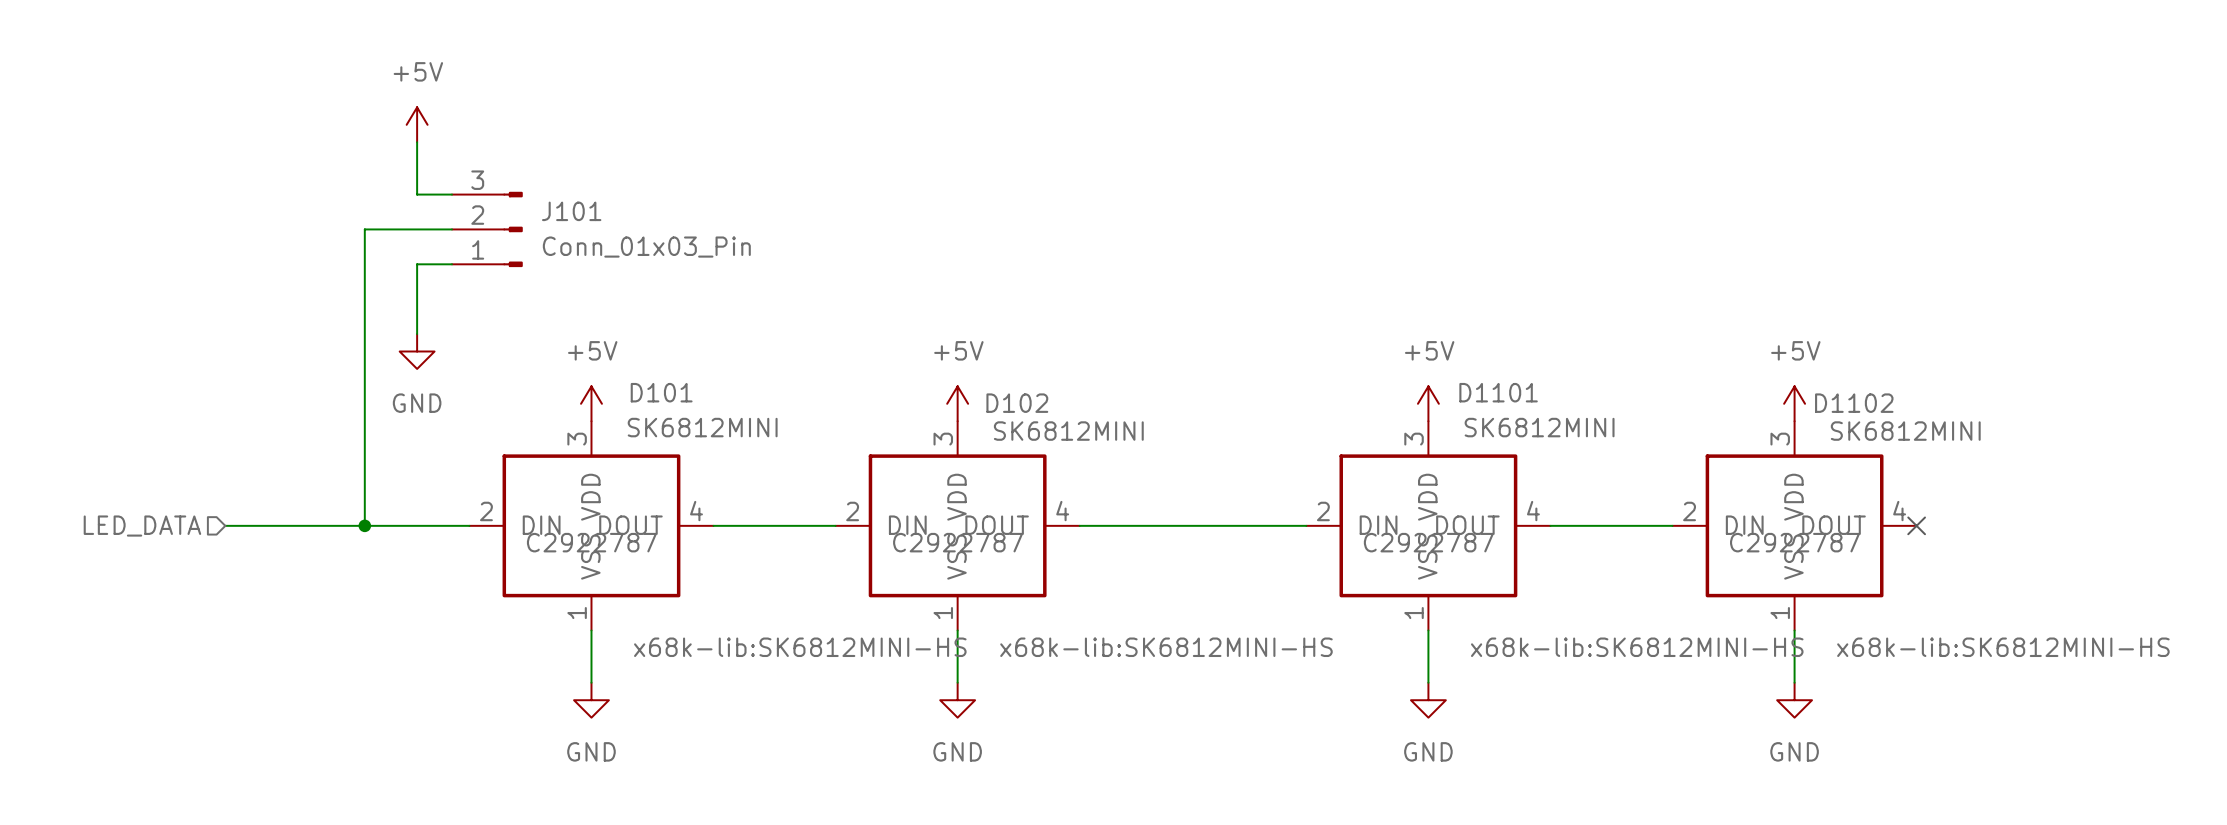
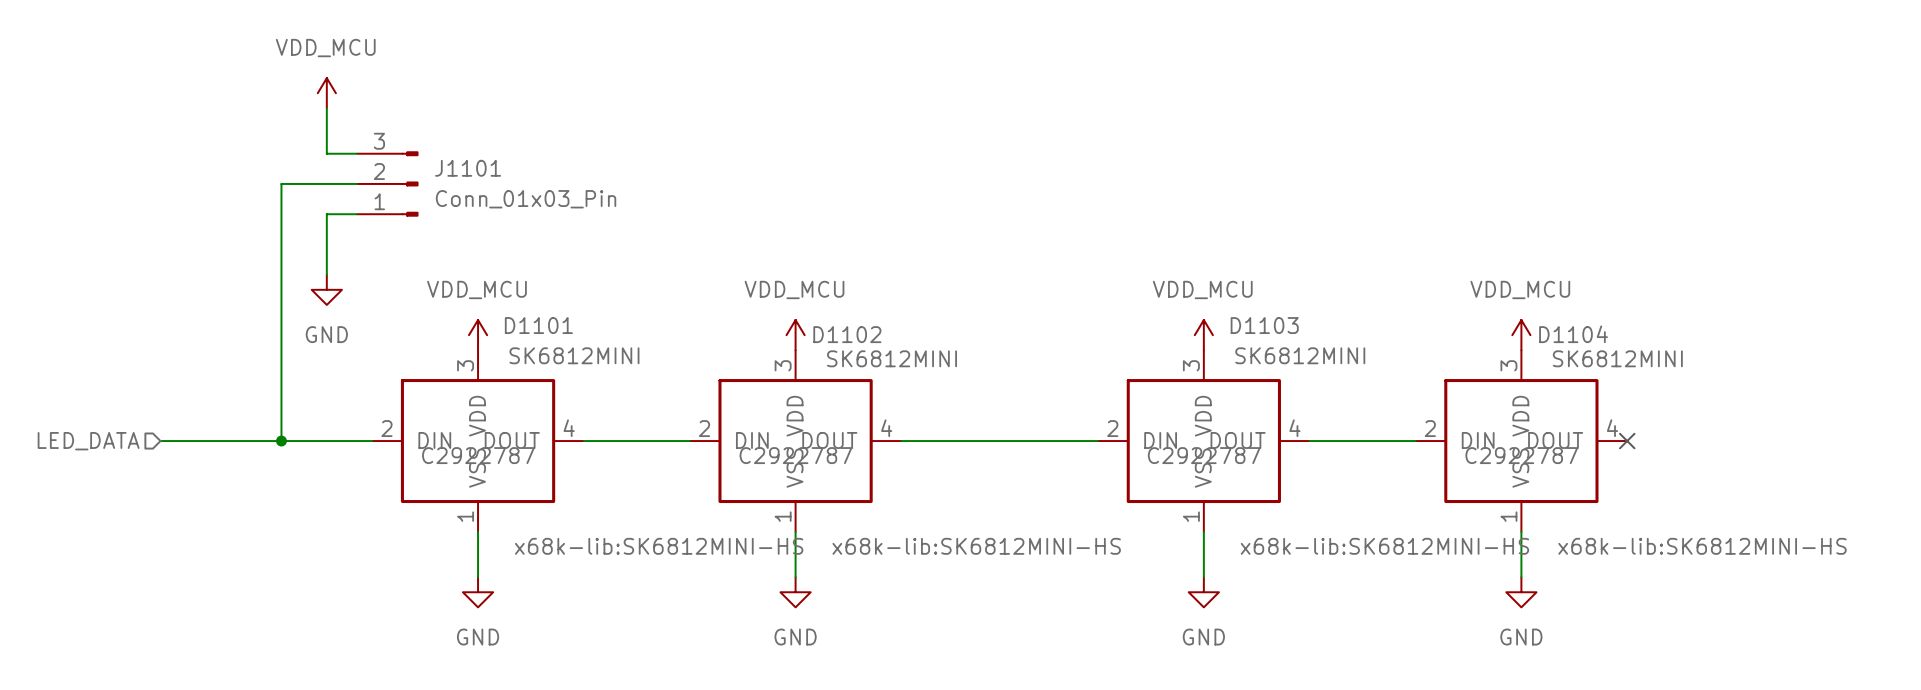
power symbol: +5V (417, 124) -> VDD_MCU (326, 93)
J101 name: J101 (571, 211) -> J1101 (468, 168)
D101 name: D101 (661, 392) -> D1101 (538, 325)
D1101 name: D1101 (1498, 392) -> D1103 (1264, 325)
power symbol: +5V (591, 403) -> VDD_MCU (478, 335)
power symbol: +5V (957, 403) -> VDD_MCU (795, 335)
D102 name: D102 (1017, 403) -> D1102 (847, 334)
power symbol: +5V (1428, 403) -> VDD_MCU (1203, 335)
power symbol: +5V (1794, 403) -> VDD_MCU (1521, 335)
D1102 name: D1102 (1854, 403) -> D1104 (1573, 334)

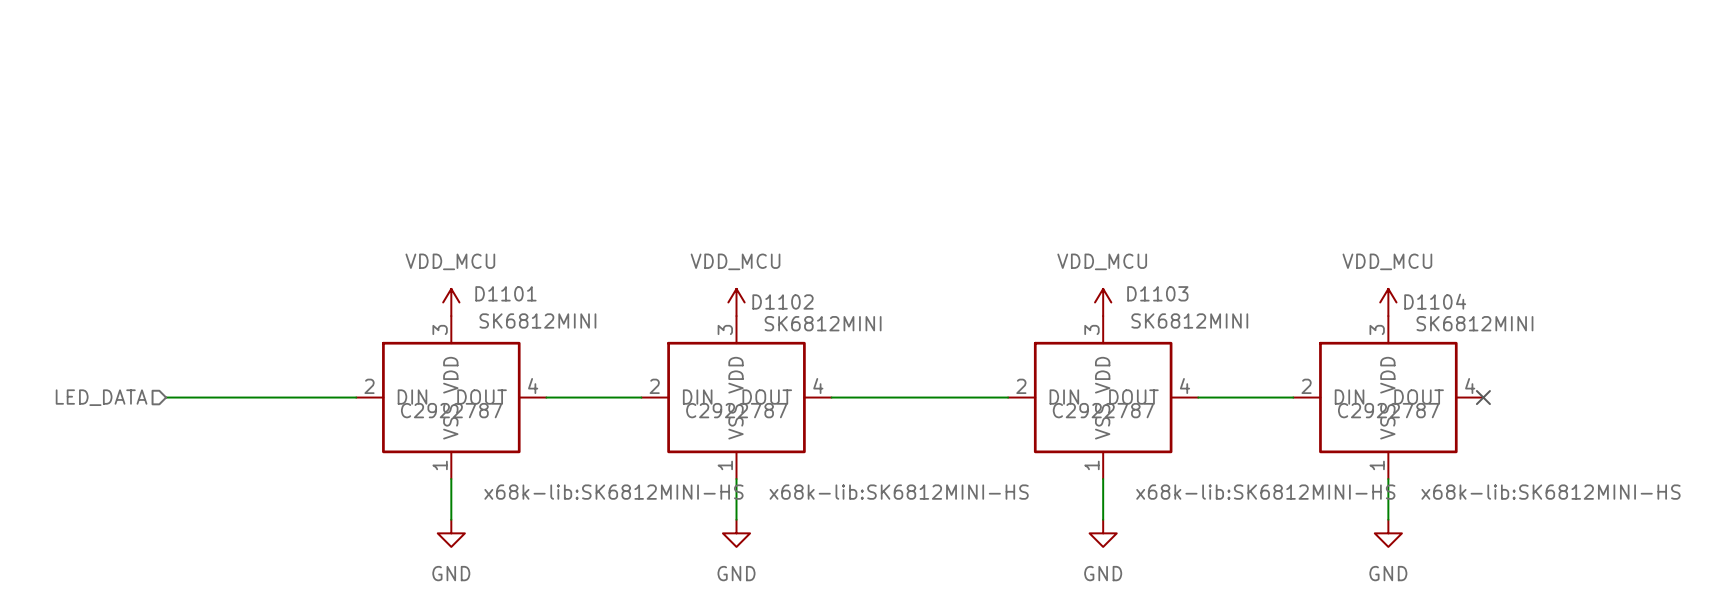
power symbol: VDD_MCU (326, 93) -> none
wire: (326, 108) (326, 153) (357, 153) -> none
wire: (357, 183) (281, 183) (281, 441) -> none
J1101: Conn_01x03_Pin (387, 183) -> none
wire: (357, 214) (326, 214) (326, 274) -> none
power symbol: GND (326, 289) -> none
junction: (281, 441) -> none

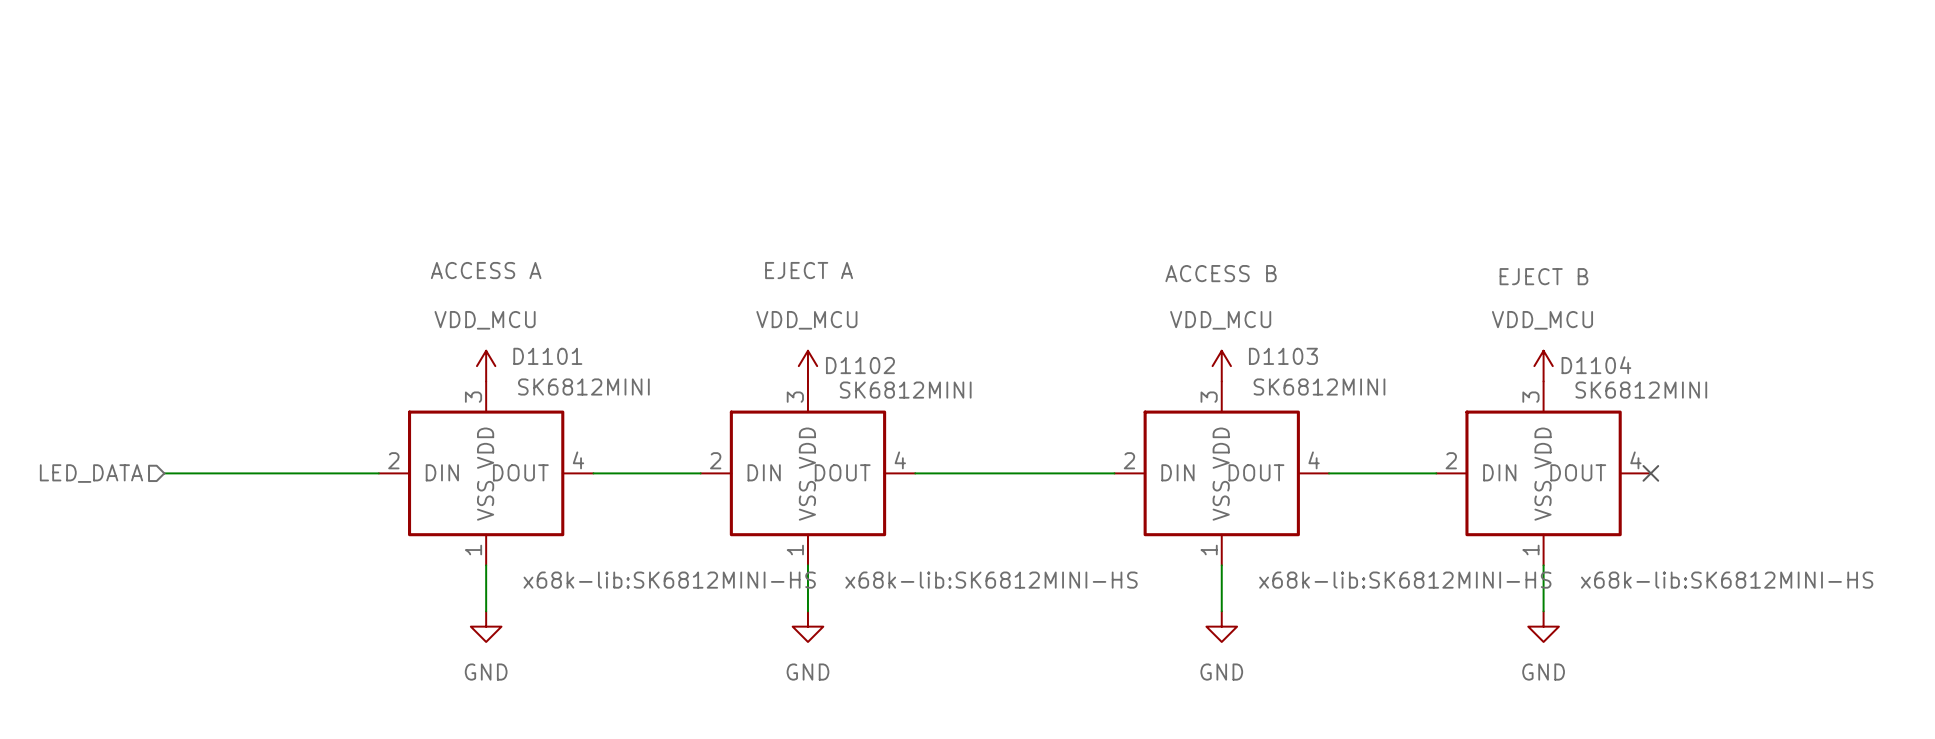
D1101 text: none -> ACCESS A (486, 270)
D1102 text: none -> EJECT A (809, 270)
D1103 text: none -> ACCESS B (1221, 273)
D1104 text: none -> EJECT B (1543, 276)
D1101 text: C2922787 (451, 410) -> none
D1102 text: C2922787 (736, 410) -> none
D1103 text: C2922787 (1103, 410) -> none
D1104 text: C2922787 (1388, 410) -> none

